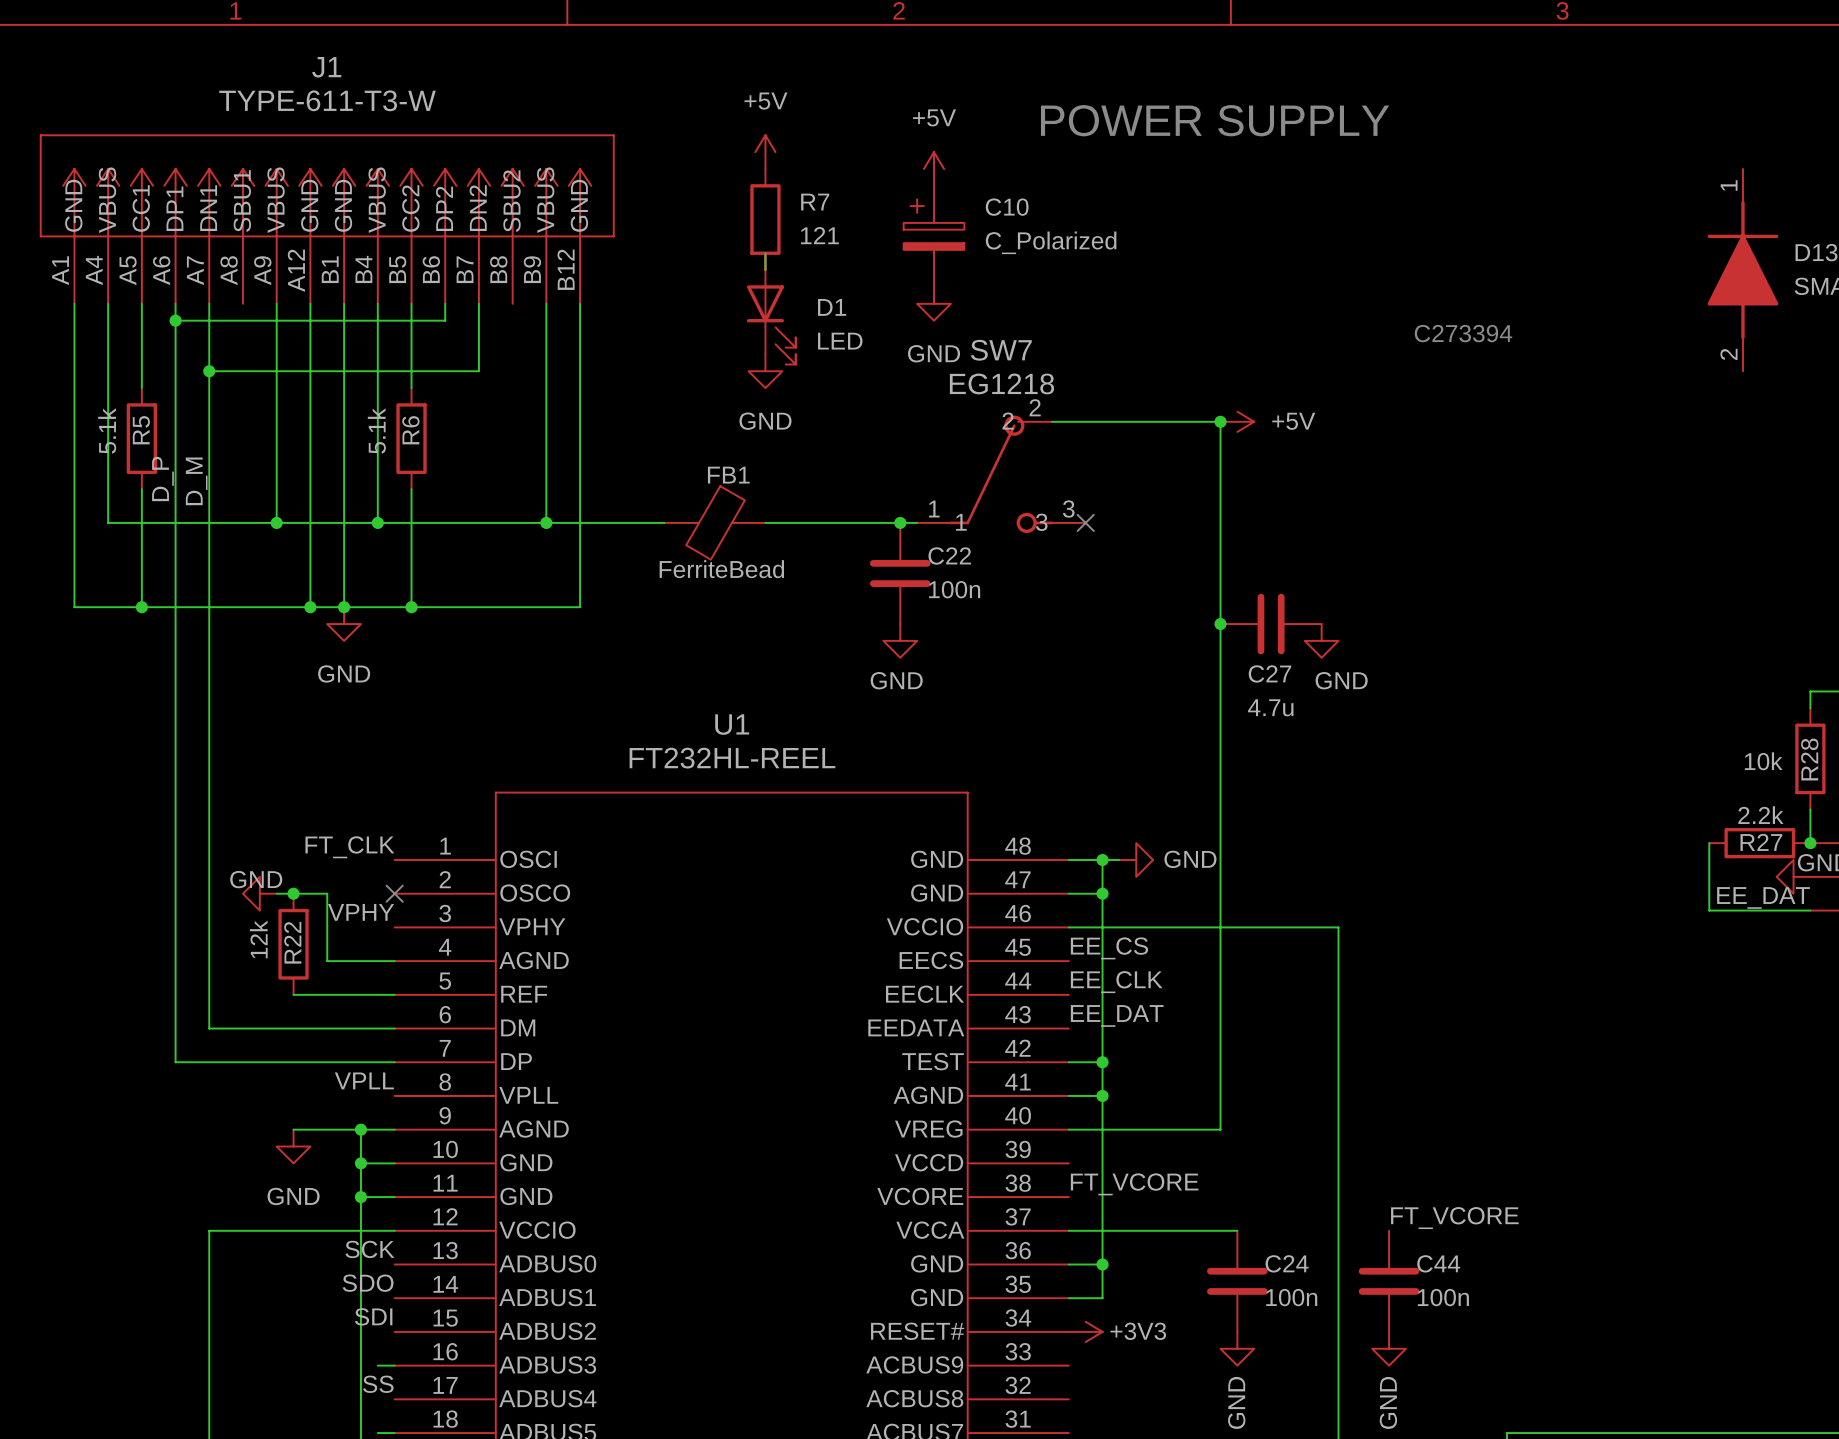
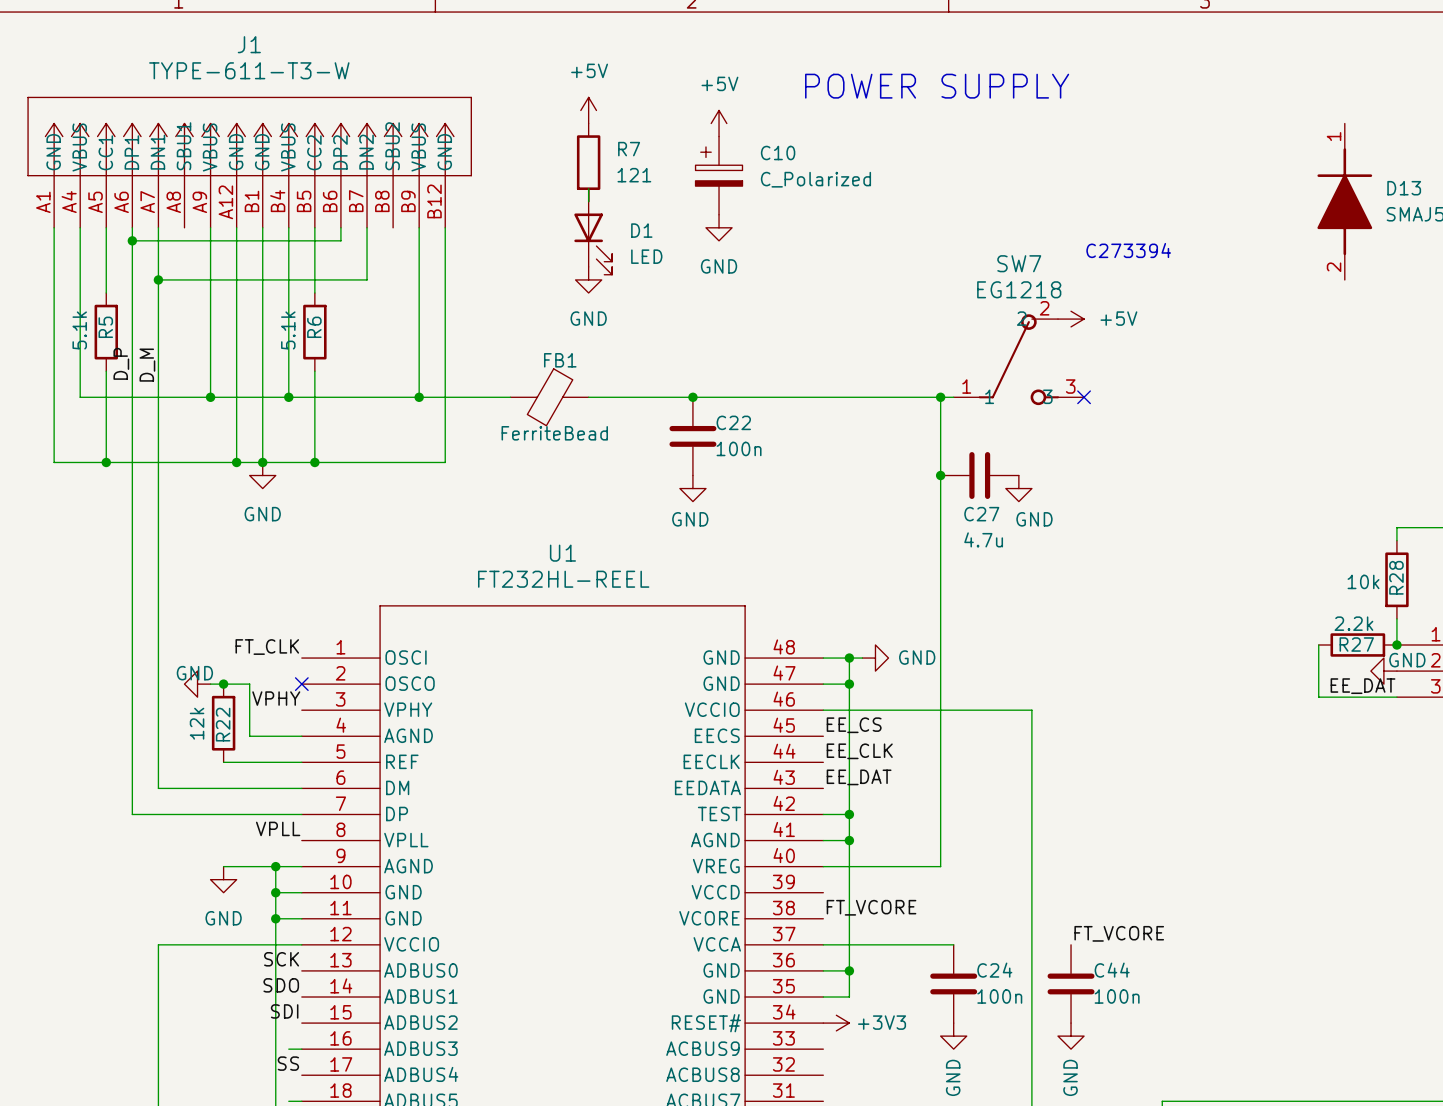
wire: (1051, 421) (1220, 421) (1220, 522) -> none
junction: (1220, 421) -> none
power symbol position: +5V (1237, 421) -> +5V (1071, 319)
SW7 position: (1001, 474) -> (1018, 359)
wire: none -> (705, 397) (953, 397)
no-connect mark: (1085, 522) -> none
junction: none -> (940, 397)
no-connect mark: none -> (1084, 397)

